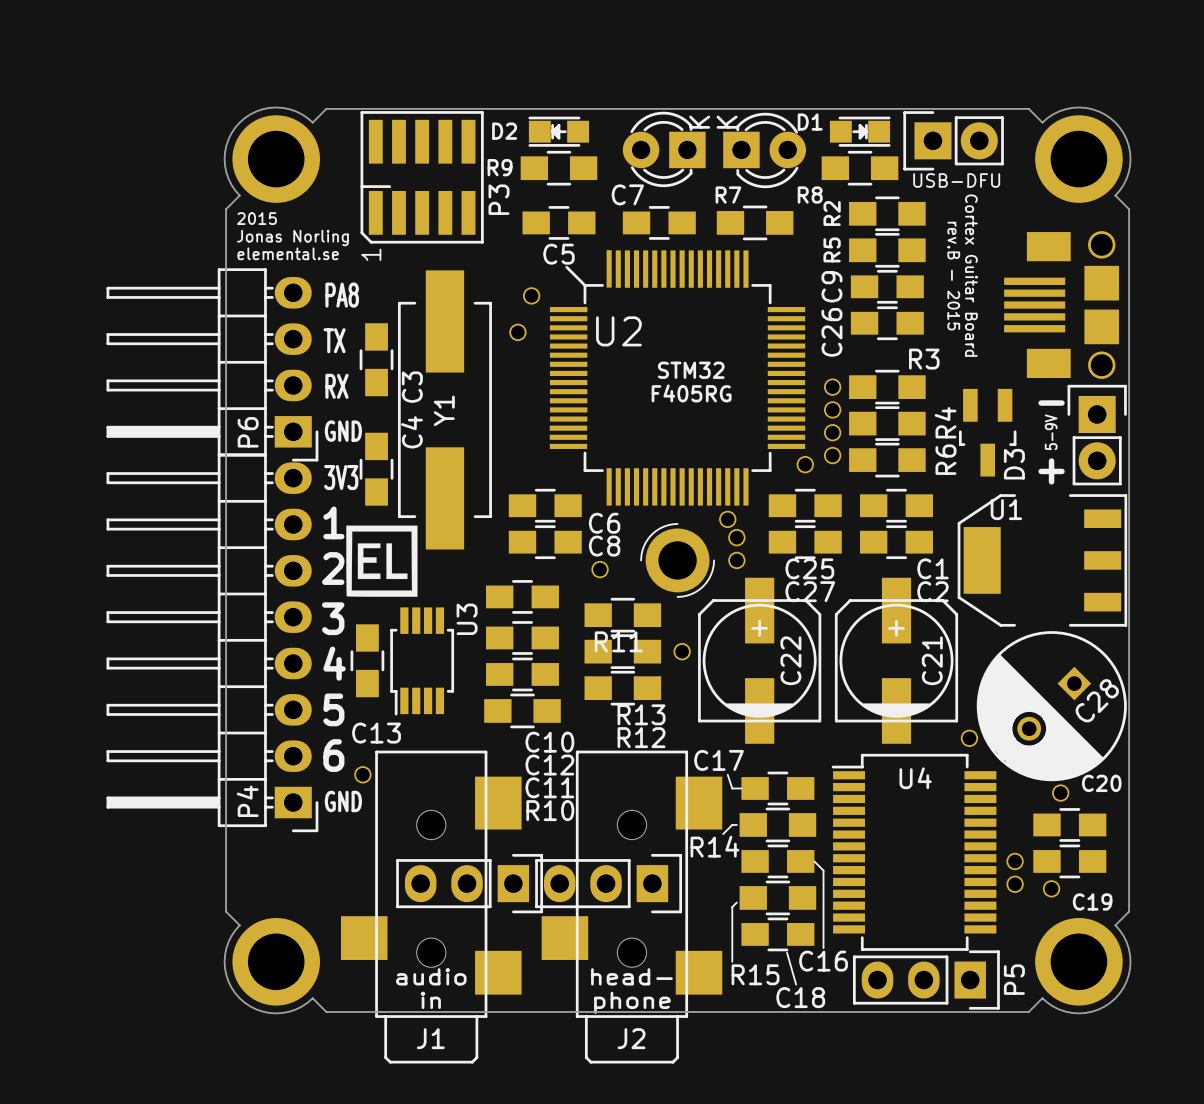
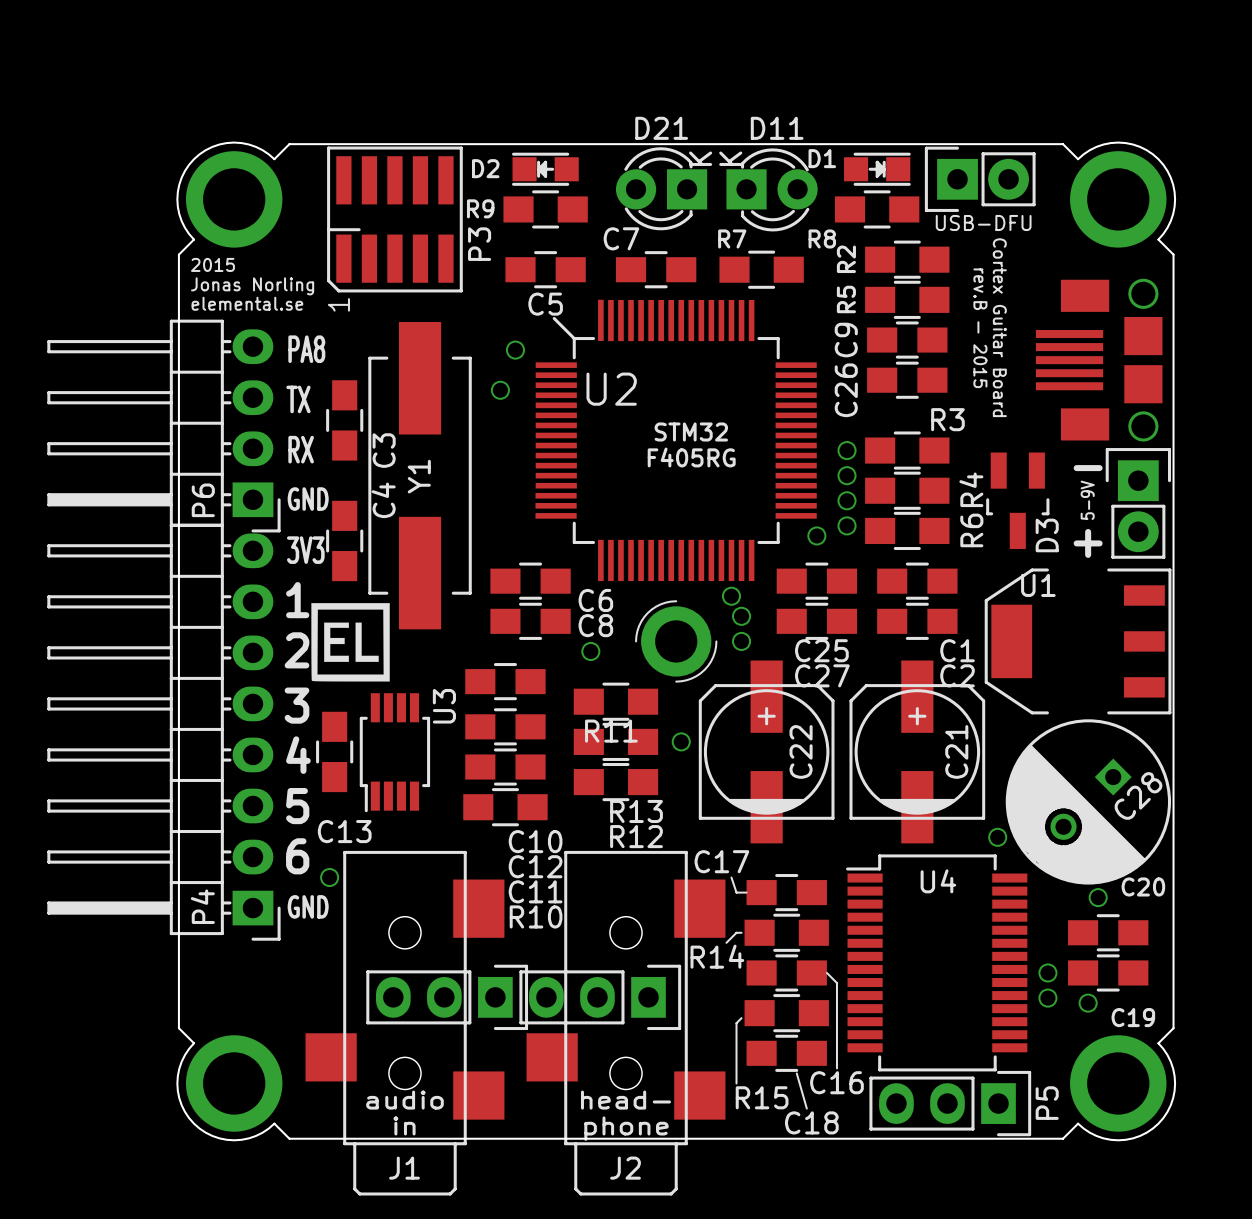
D21 name: none -> D21 (661, 128)
D11 name: none -> D11 (777, 128)

